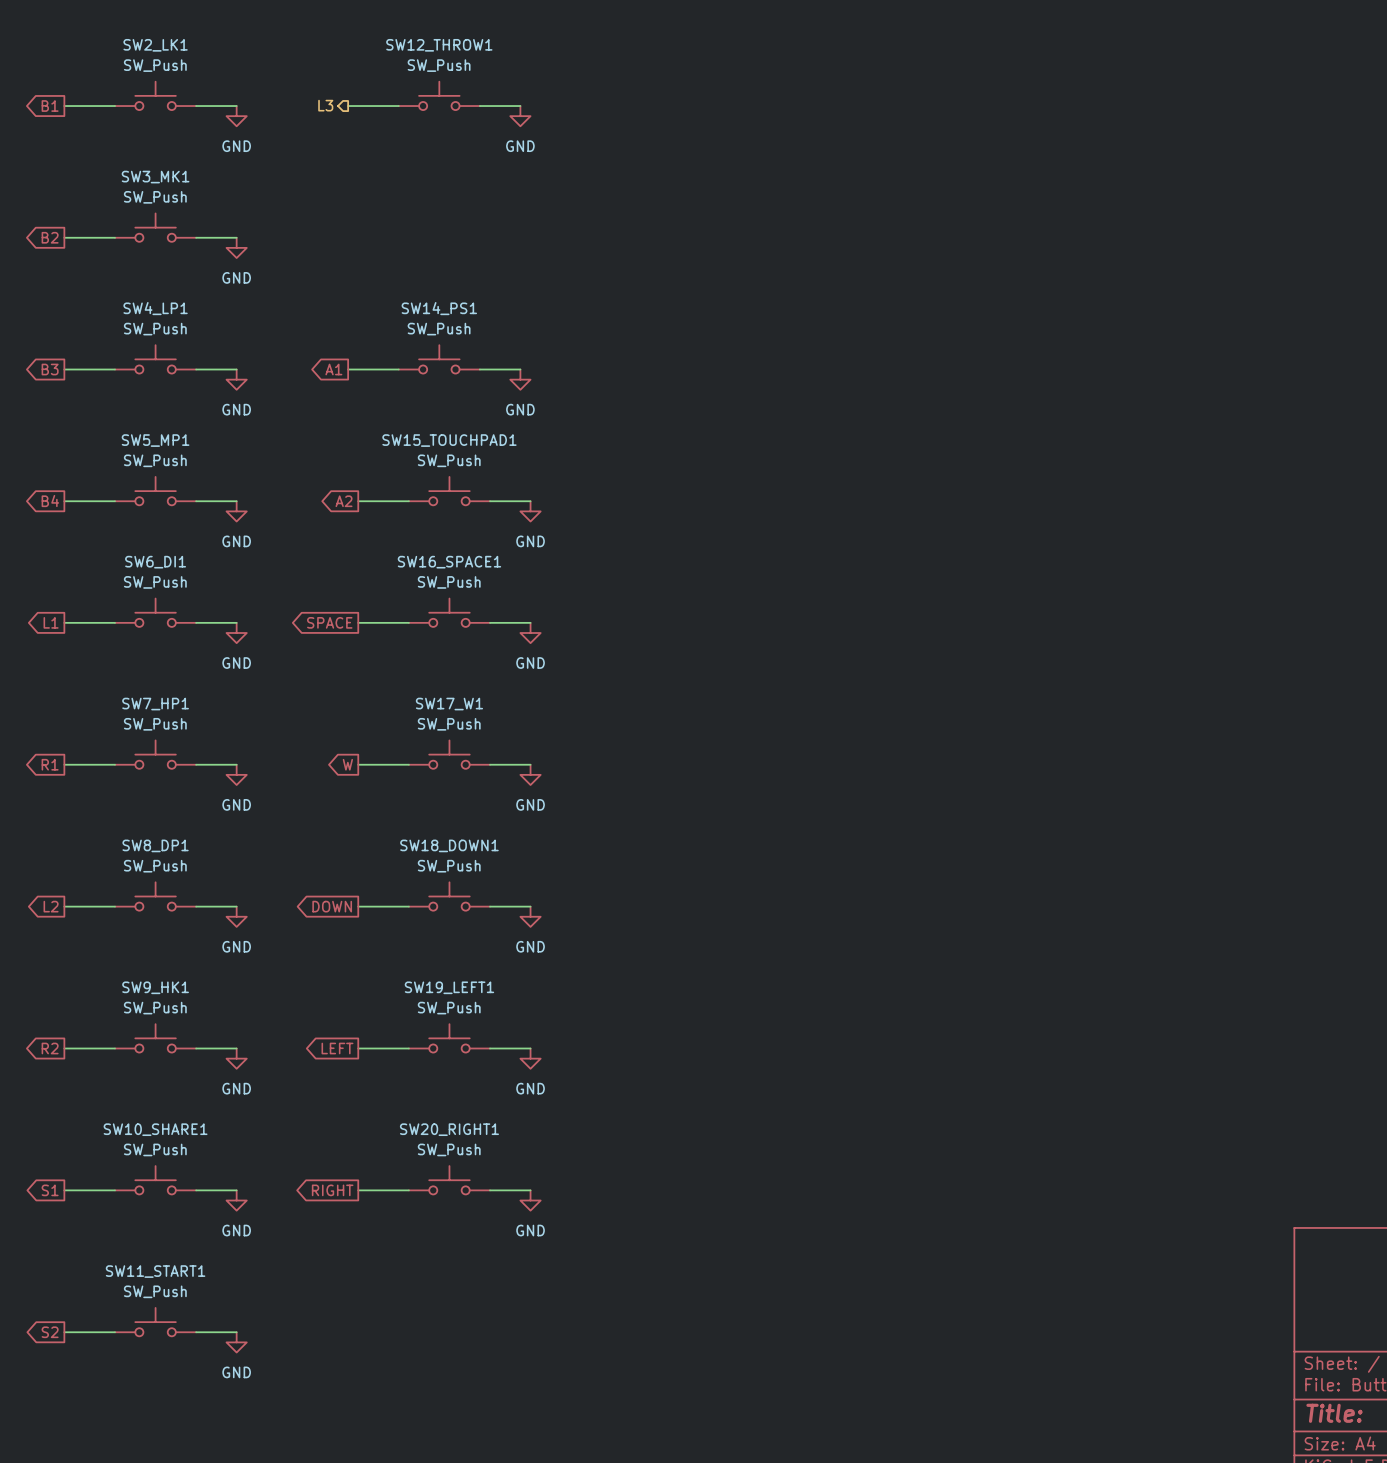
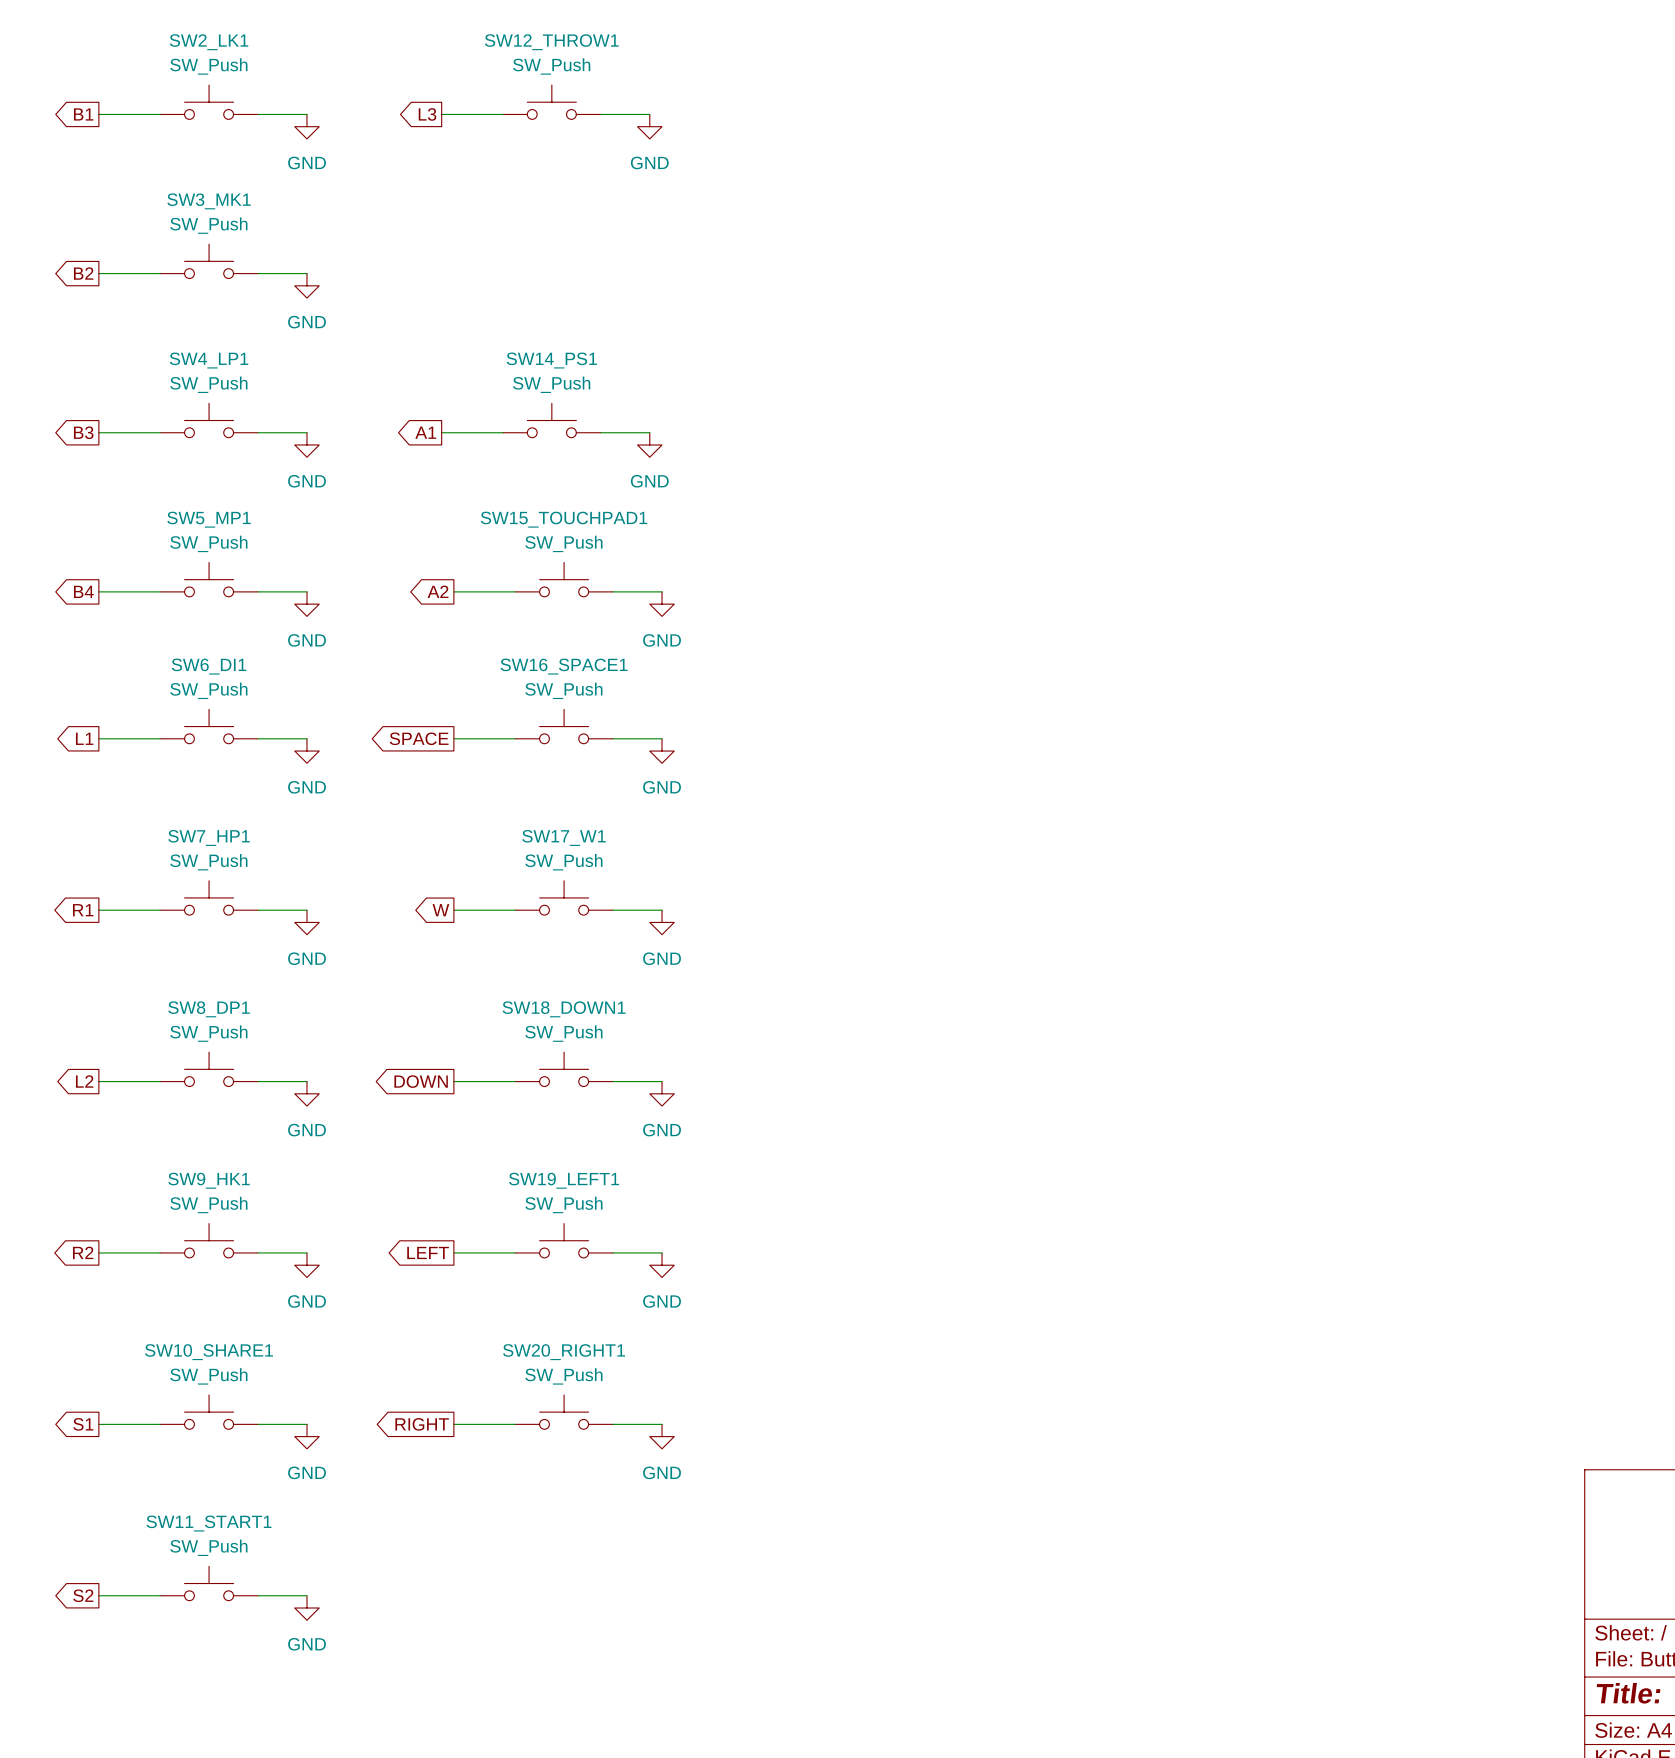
hierarchical label: L3 (325, 105) -> none
global label: none -> L3 (427, 114)

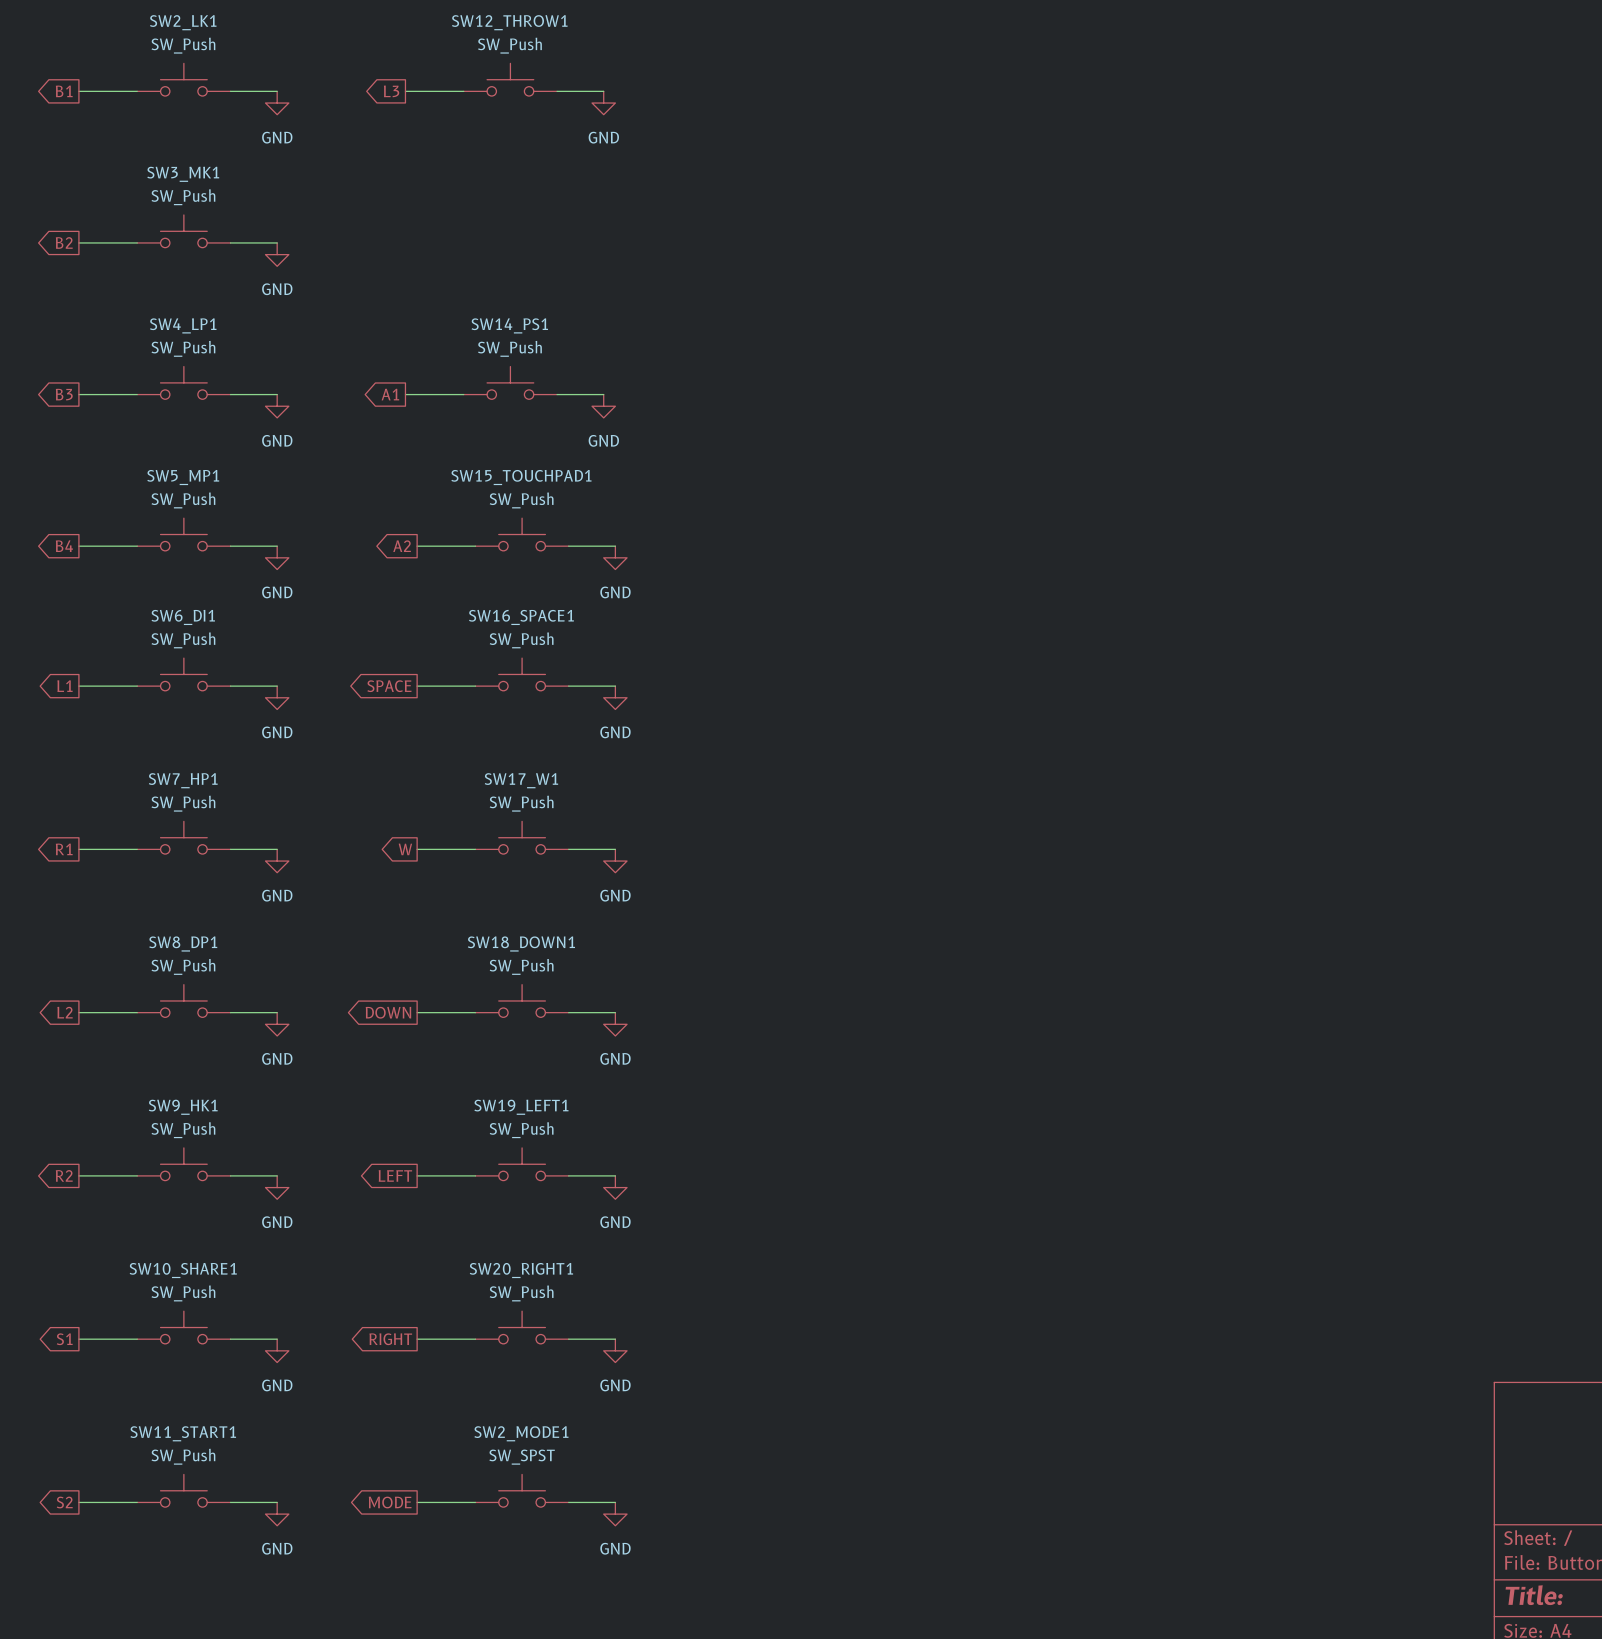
SW2_MODE1: none -> SW_SPST (522, 1490)
global label: none -> MODE (390, 1502)
wire: none -> (417, 1502) (475, 1502)
wire: none -> (568, 1502) (615, 1502)
power symbol: none -> GND (615, 1514)

